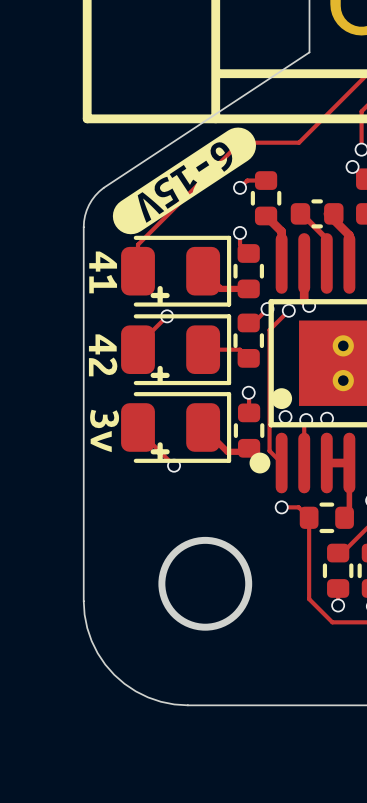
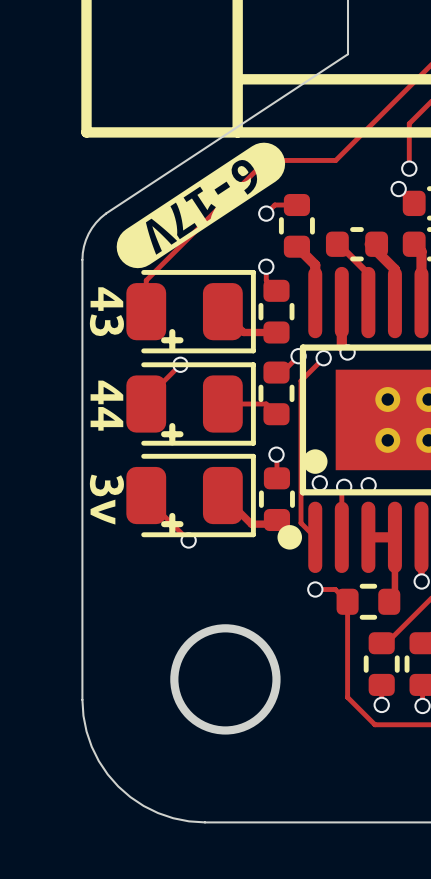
drawing shape: [112, 127, 257, 235] -> [116, 142, 286, 269]
drawing shape: [89, 251, 118, 294] -> [89, 287, 124, 337]
drawing shape: [88, 334, 118, 377] -> [90, 380, 124, 431]

